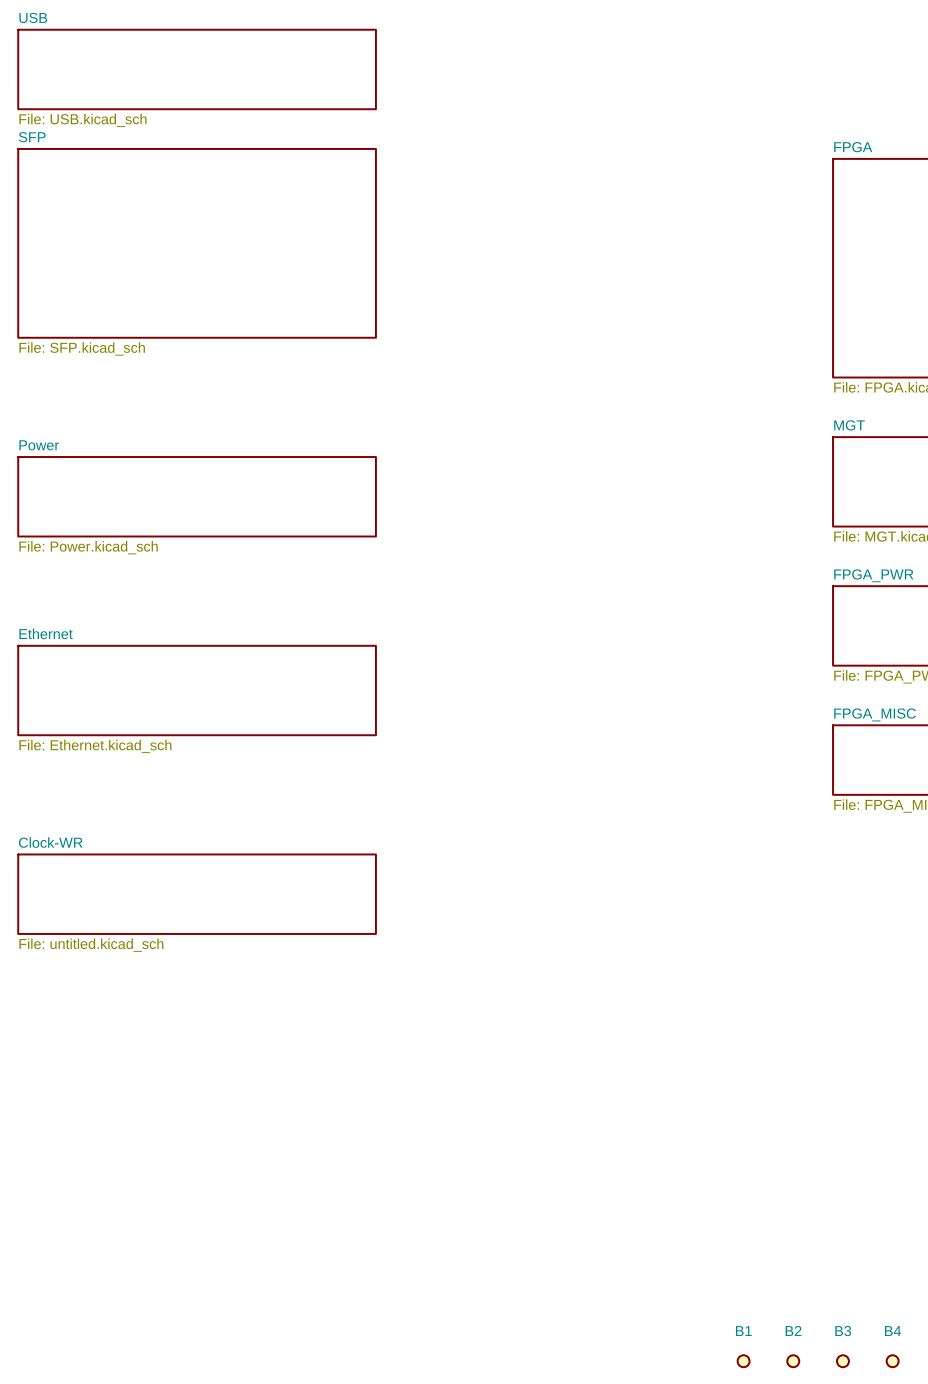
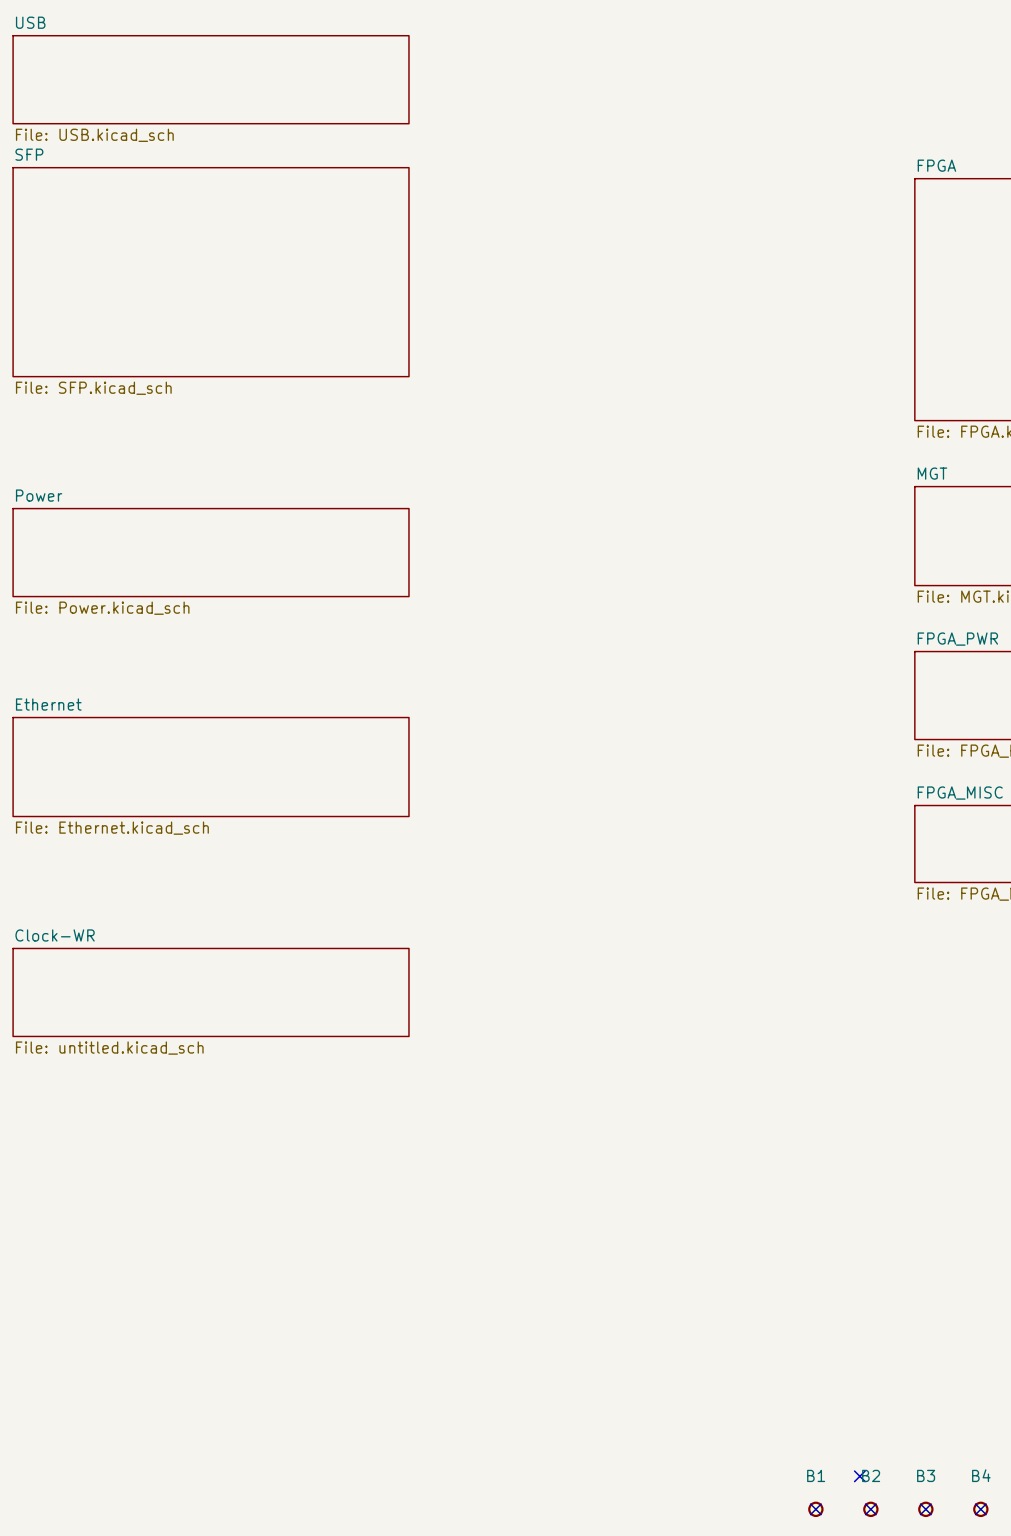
no-connect mark: none -> (859, 1476)
no-connect mark: none -> (815, 1509)
no-connect mark: none -> (870, 1509)
no-connect mark: none -> (925, 1509)
no-connect mark: none -> (980, 1509)

